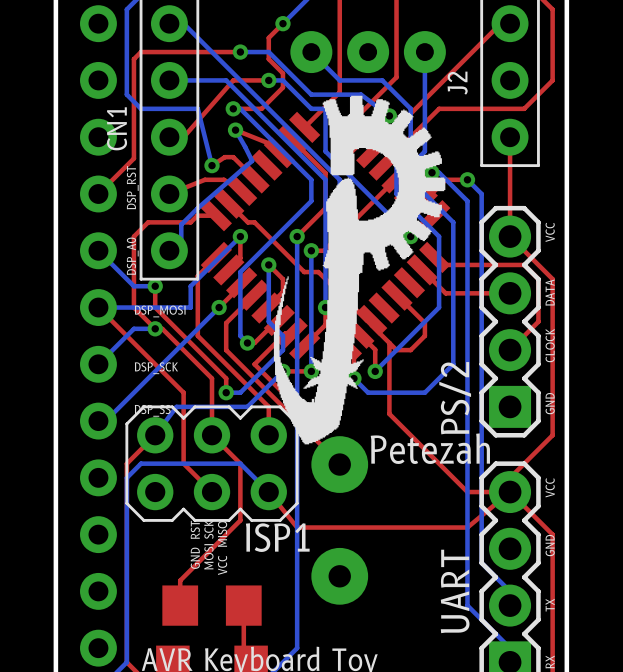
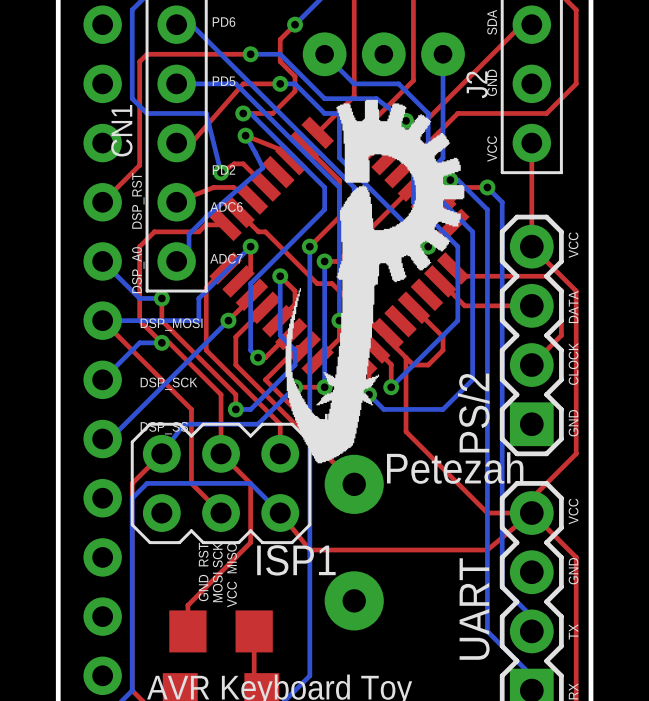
text: none -> SDA (492, 22)
text: none -> PD6 (224, 22)
text: none -> PD5 (224, 81)
text: none -> GND (492, 82)
text: none -> VCC (492, 148)
text: none -> PD2 (223, 169)
text: none -> ADC6 (226, 206)
text: none -> ADC7 (226, 258)

